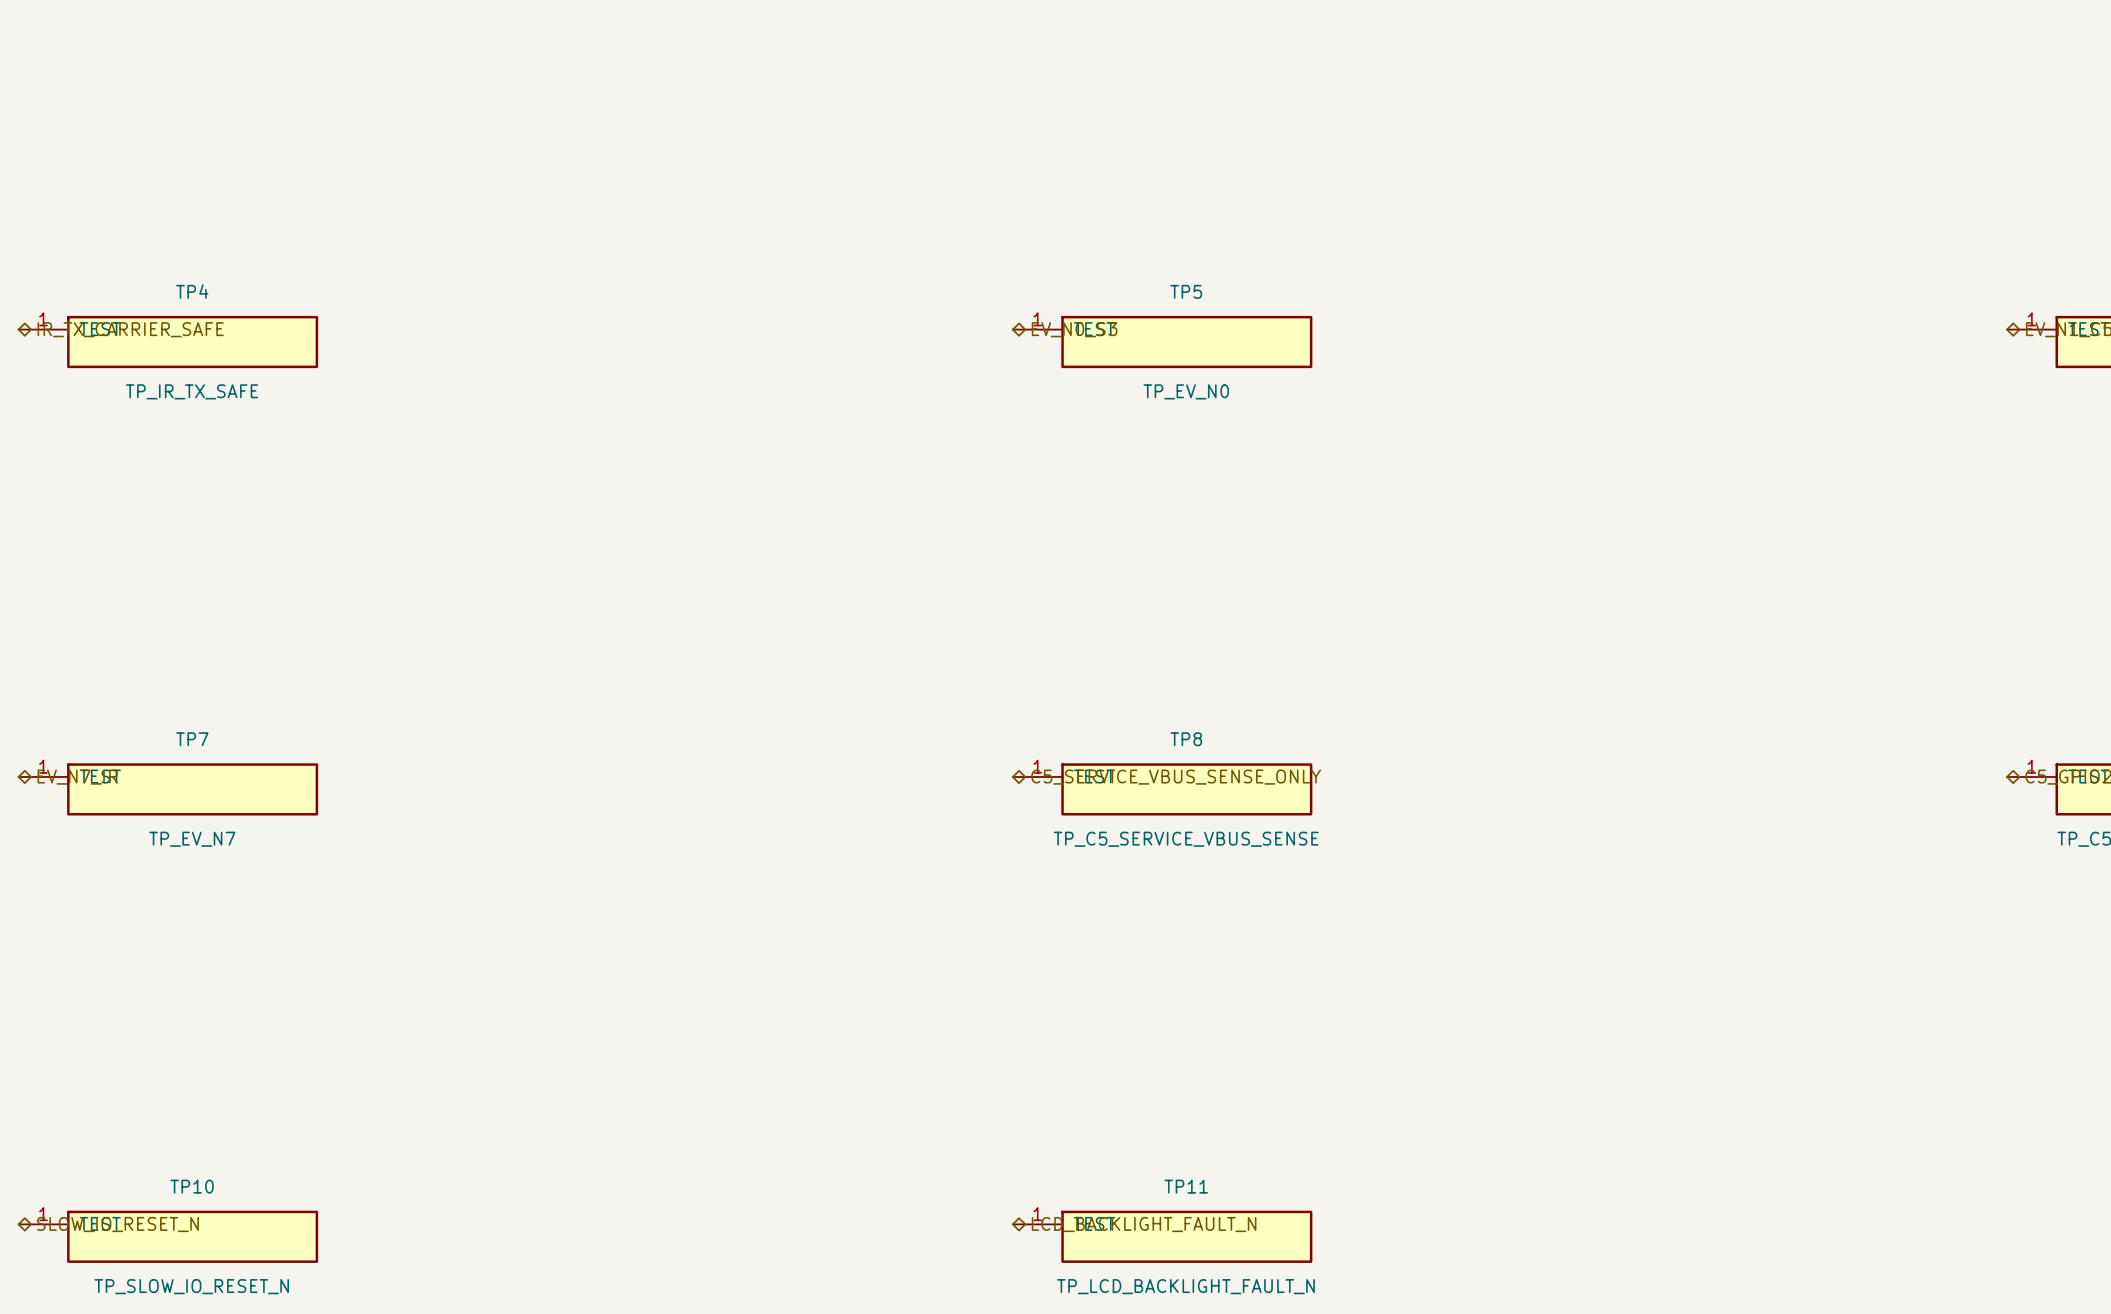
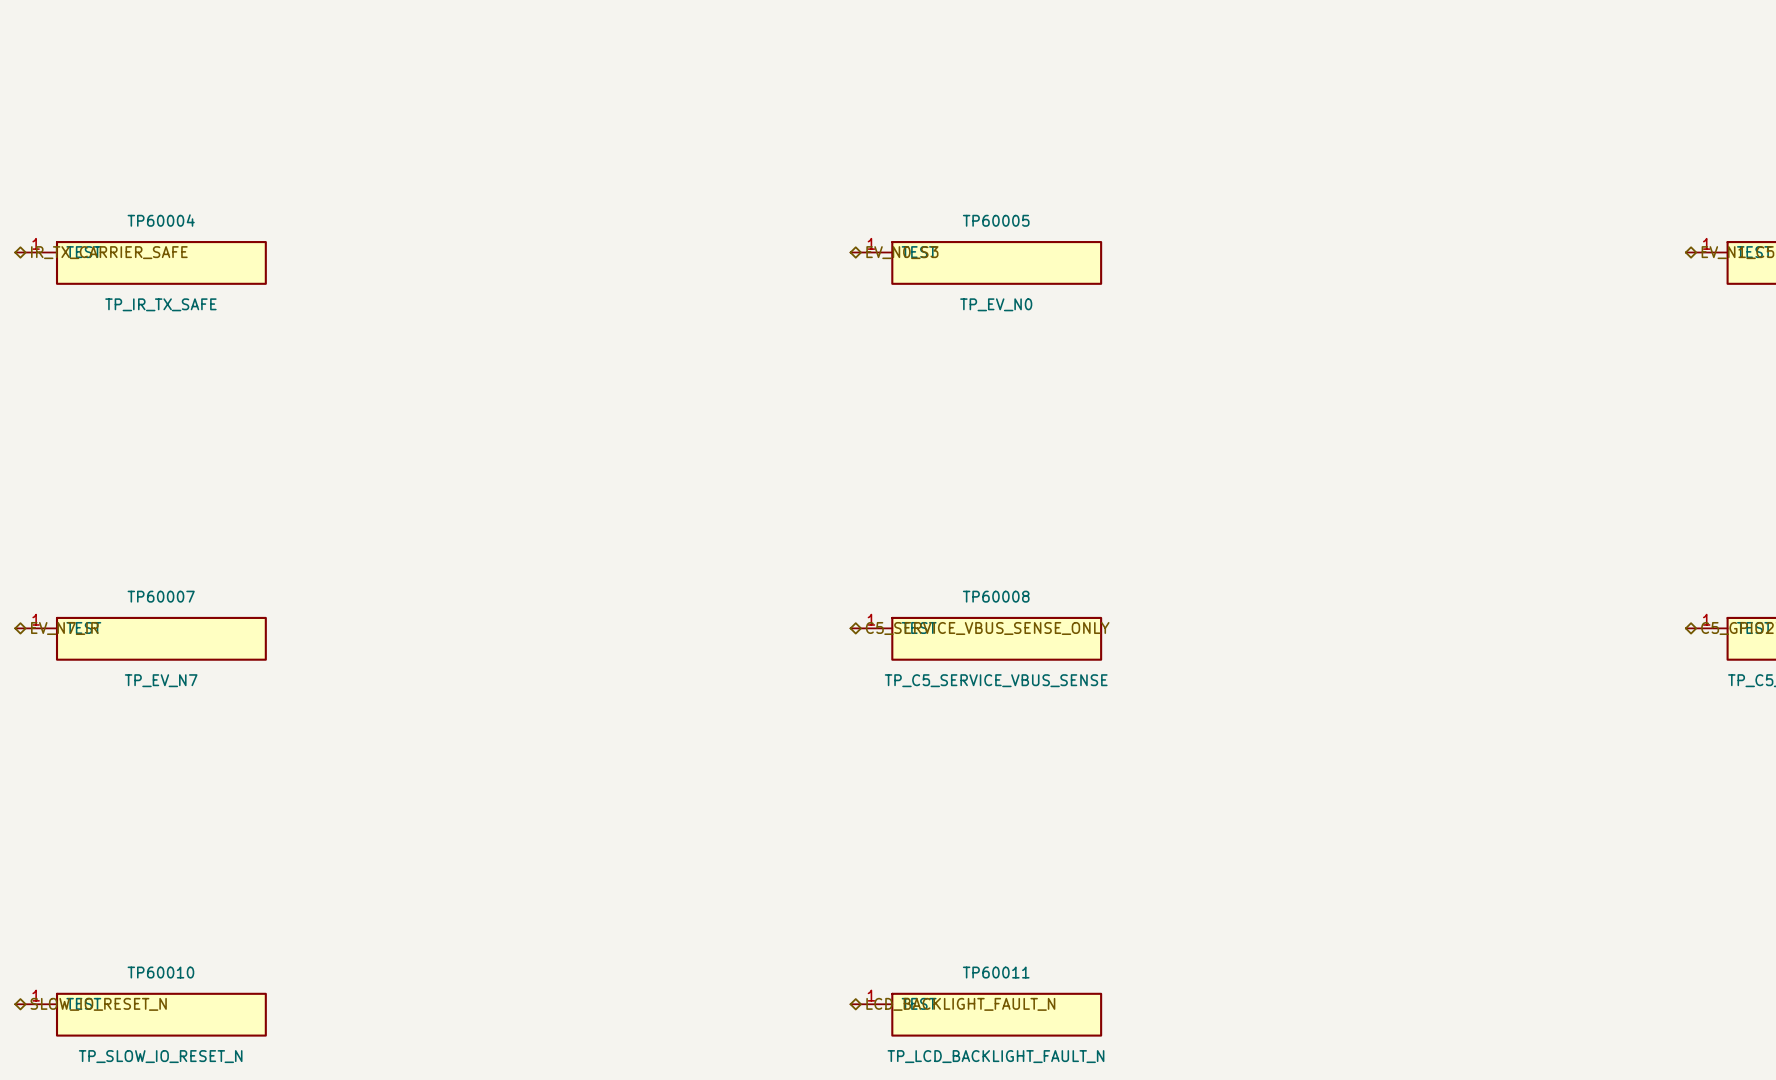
TP4 name: TP4 (192, 291) -> TP60004 (161, 220)
TP5 name: TP5 (1186, 291) -> TP60005 (996, 220)
TP7 name: TP7 (192, 739) -> TP60007 (161, 596)
TP8 name: TP8 (1186, 739) -> TP60008 (996, 596)
TP10 name: TP10 (192, 1186) -> TP60010 (160, 972)
TP11 name: TP11 (1186, 1186) -> TP60011 (996, 972)

